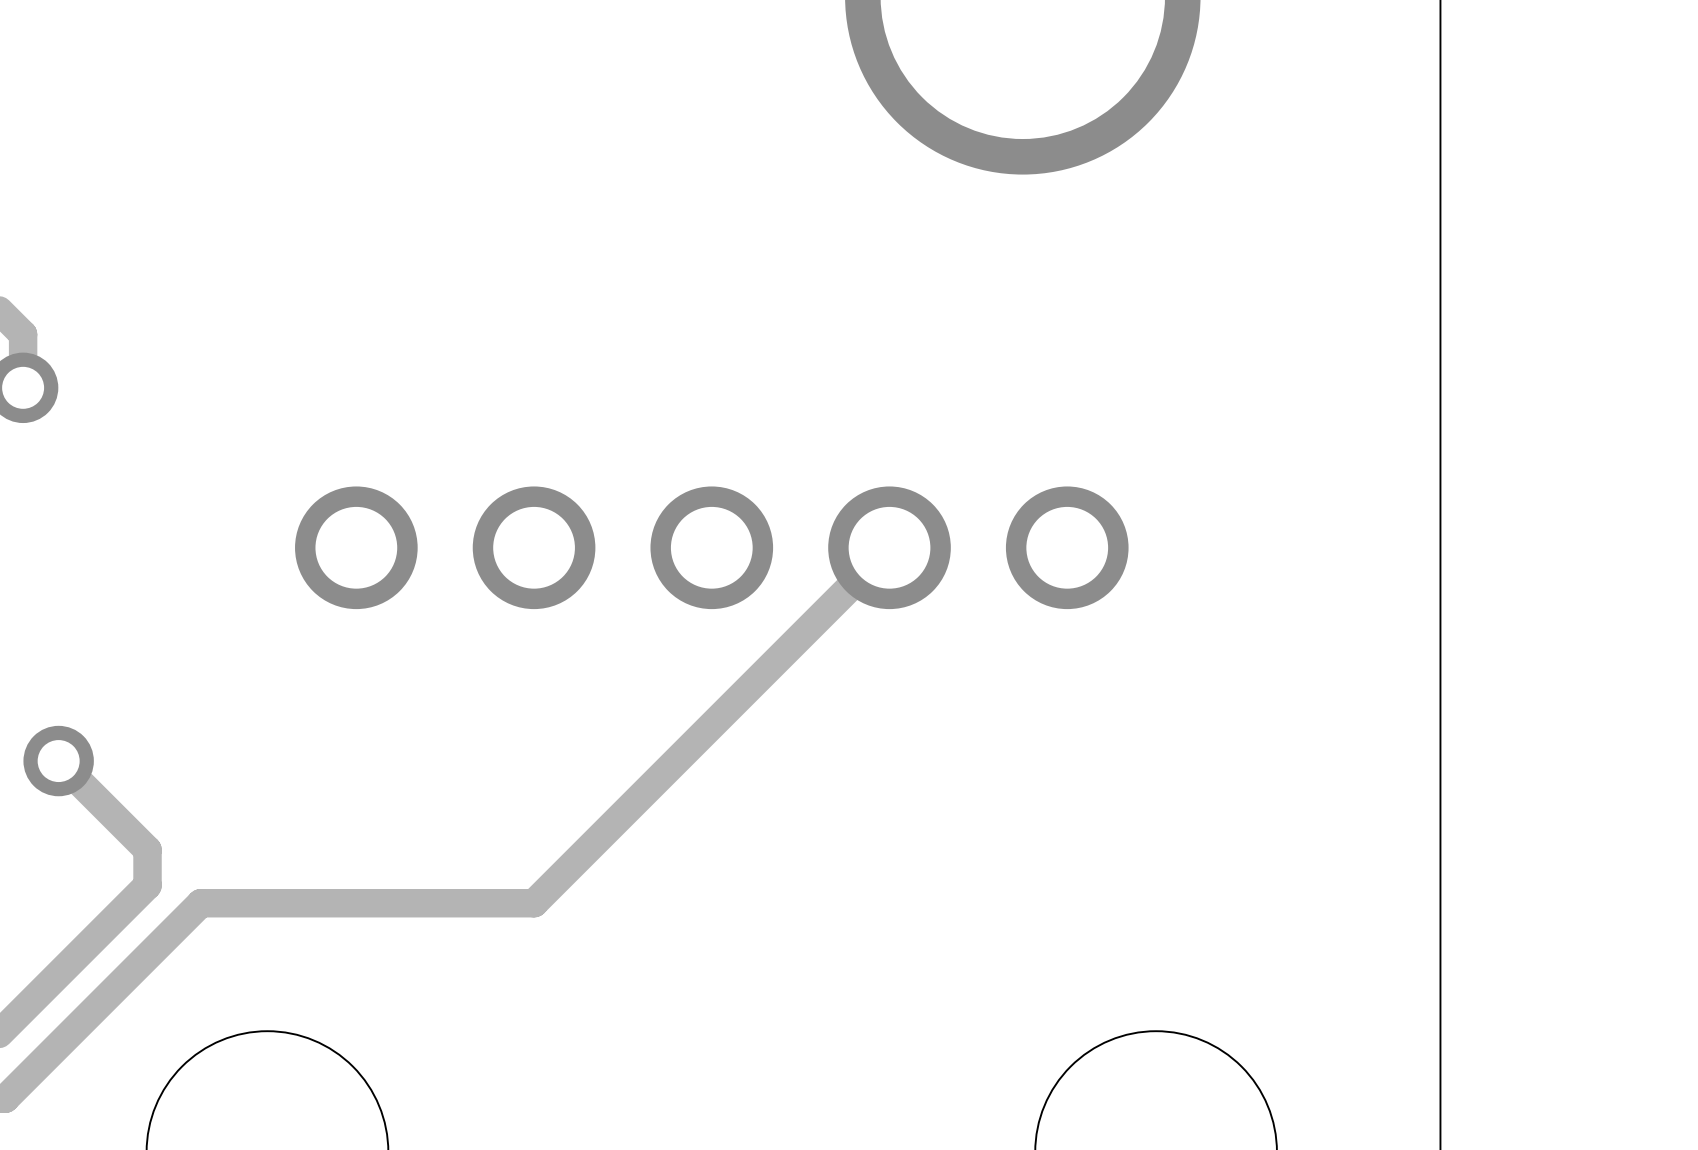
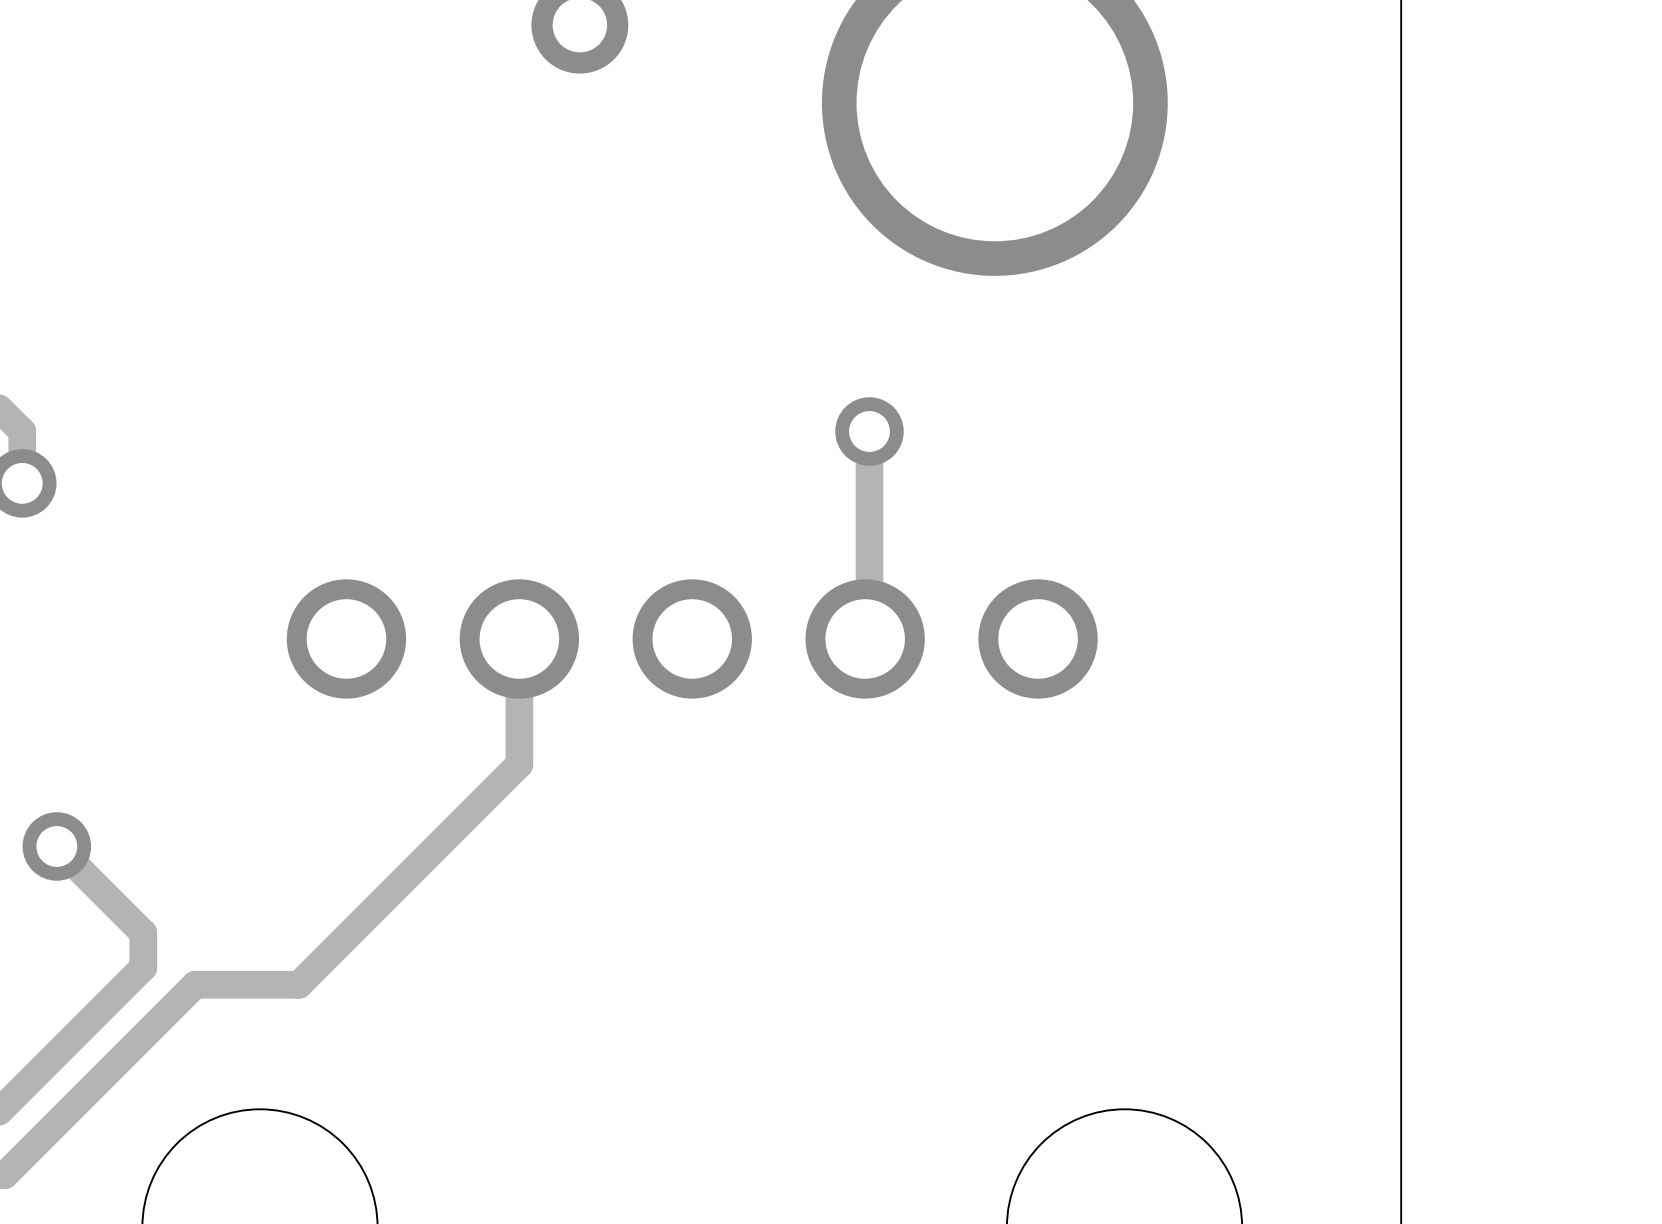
track: none -> (869, 431) (869, 634) (865, 638)
via: none -> (869, 431)
track: (889, 547) (534, 903) (307, 903) -> (519, 638) (519, 764) (298, 984)

